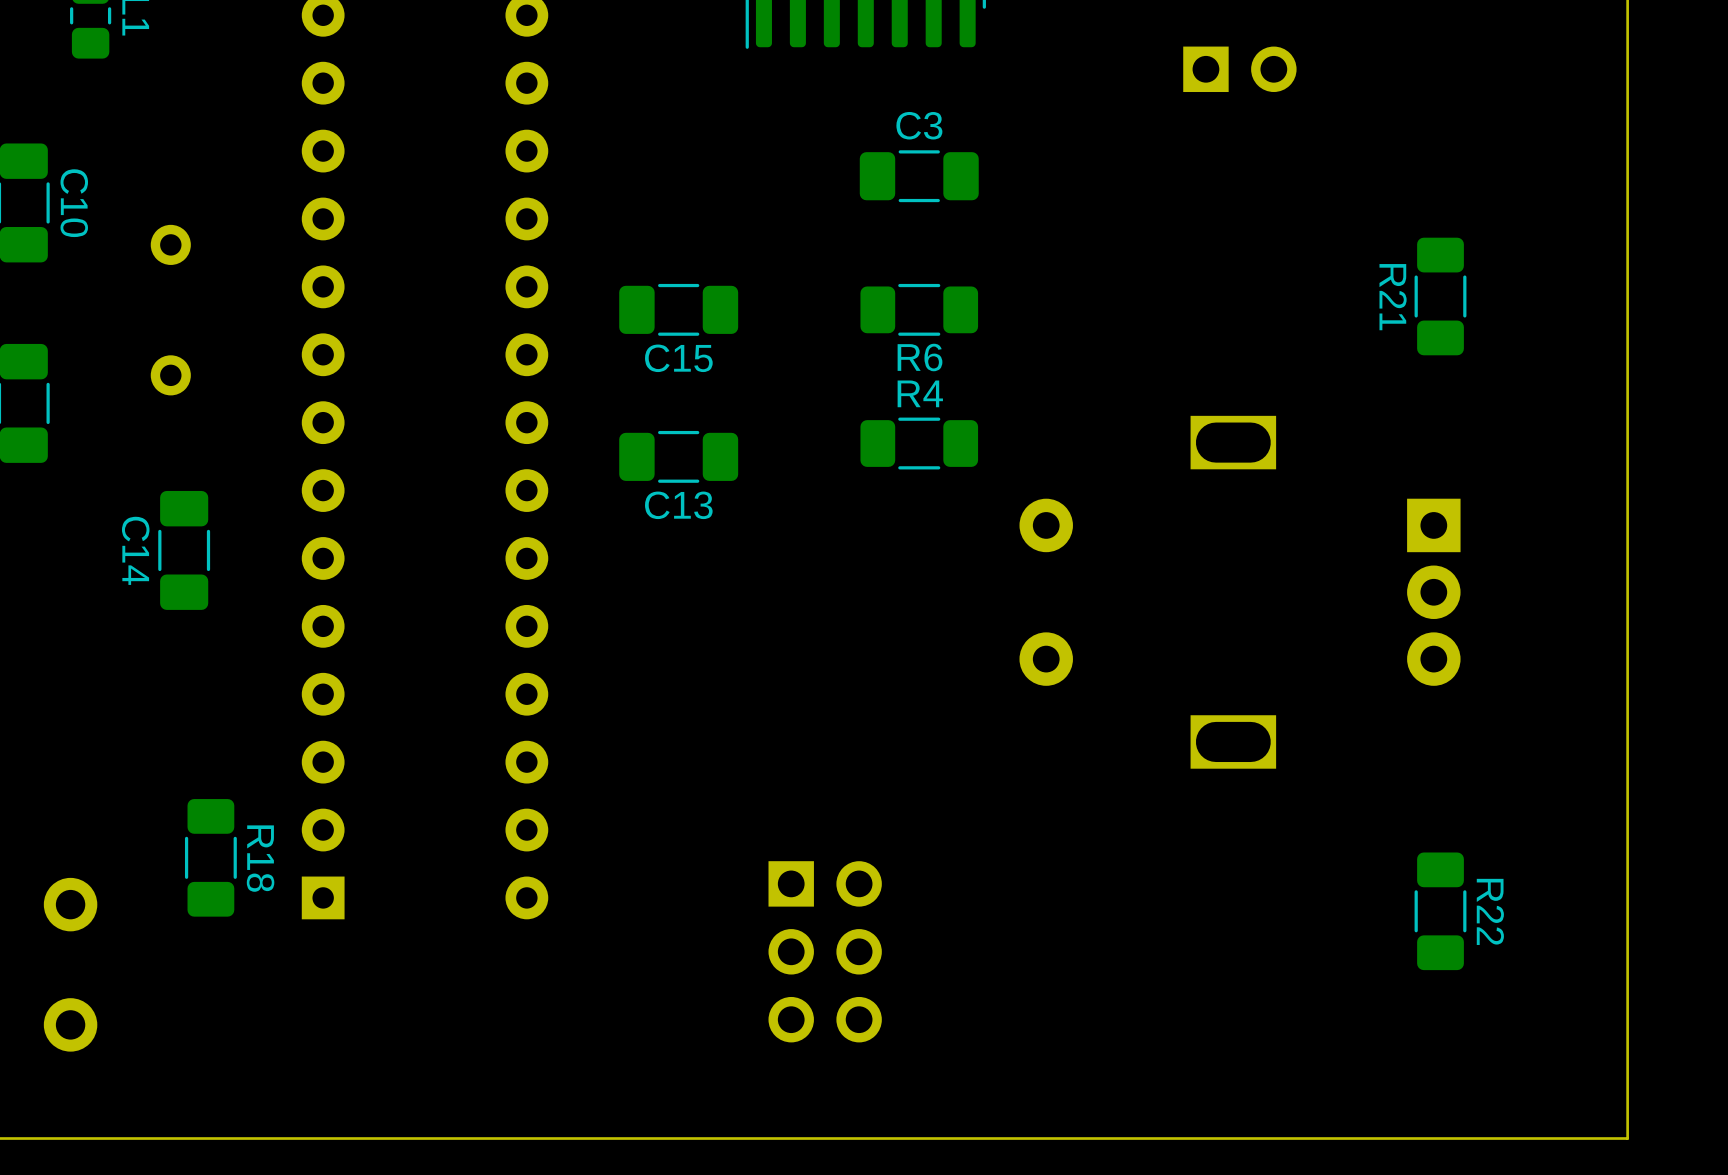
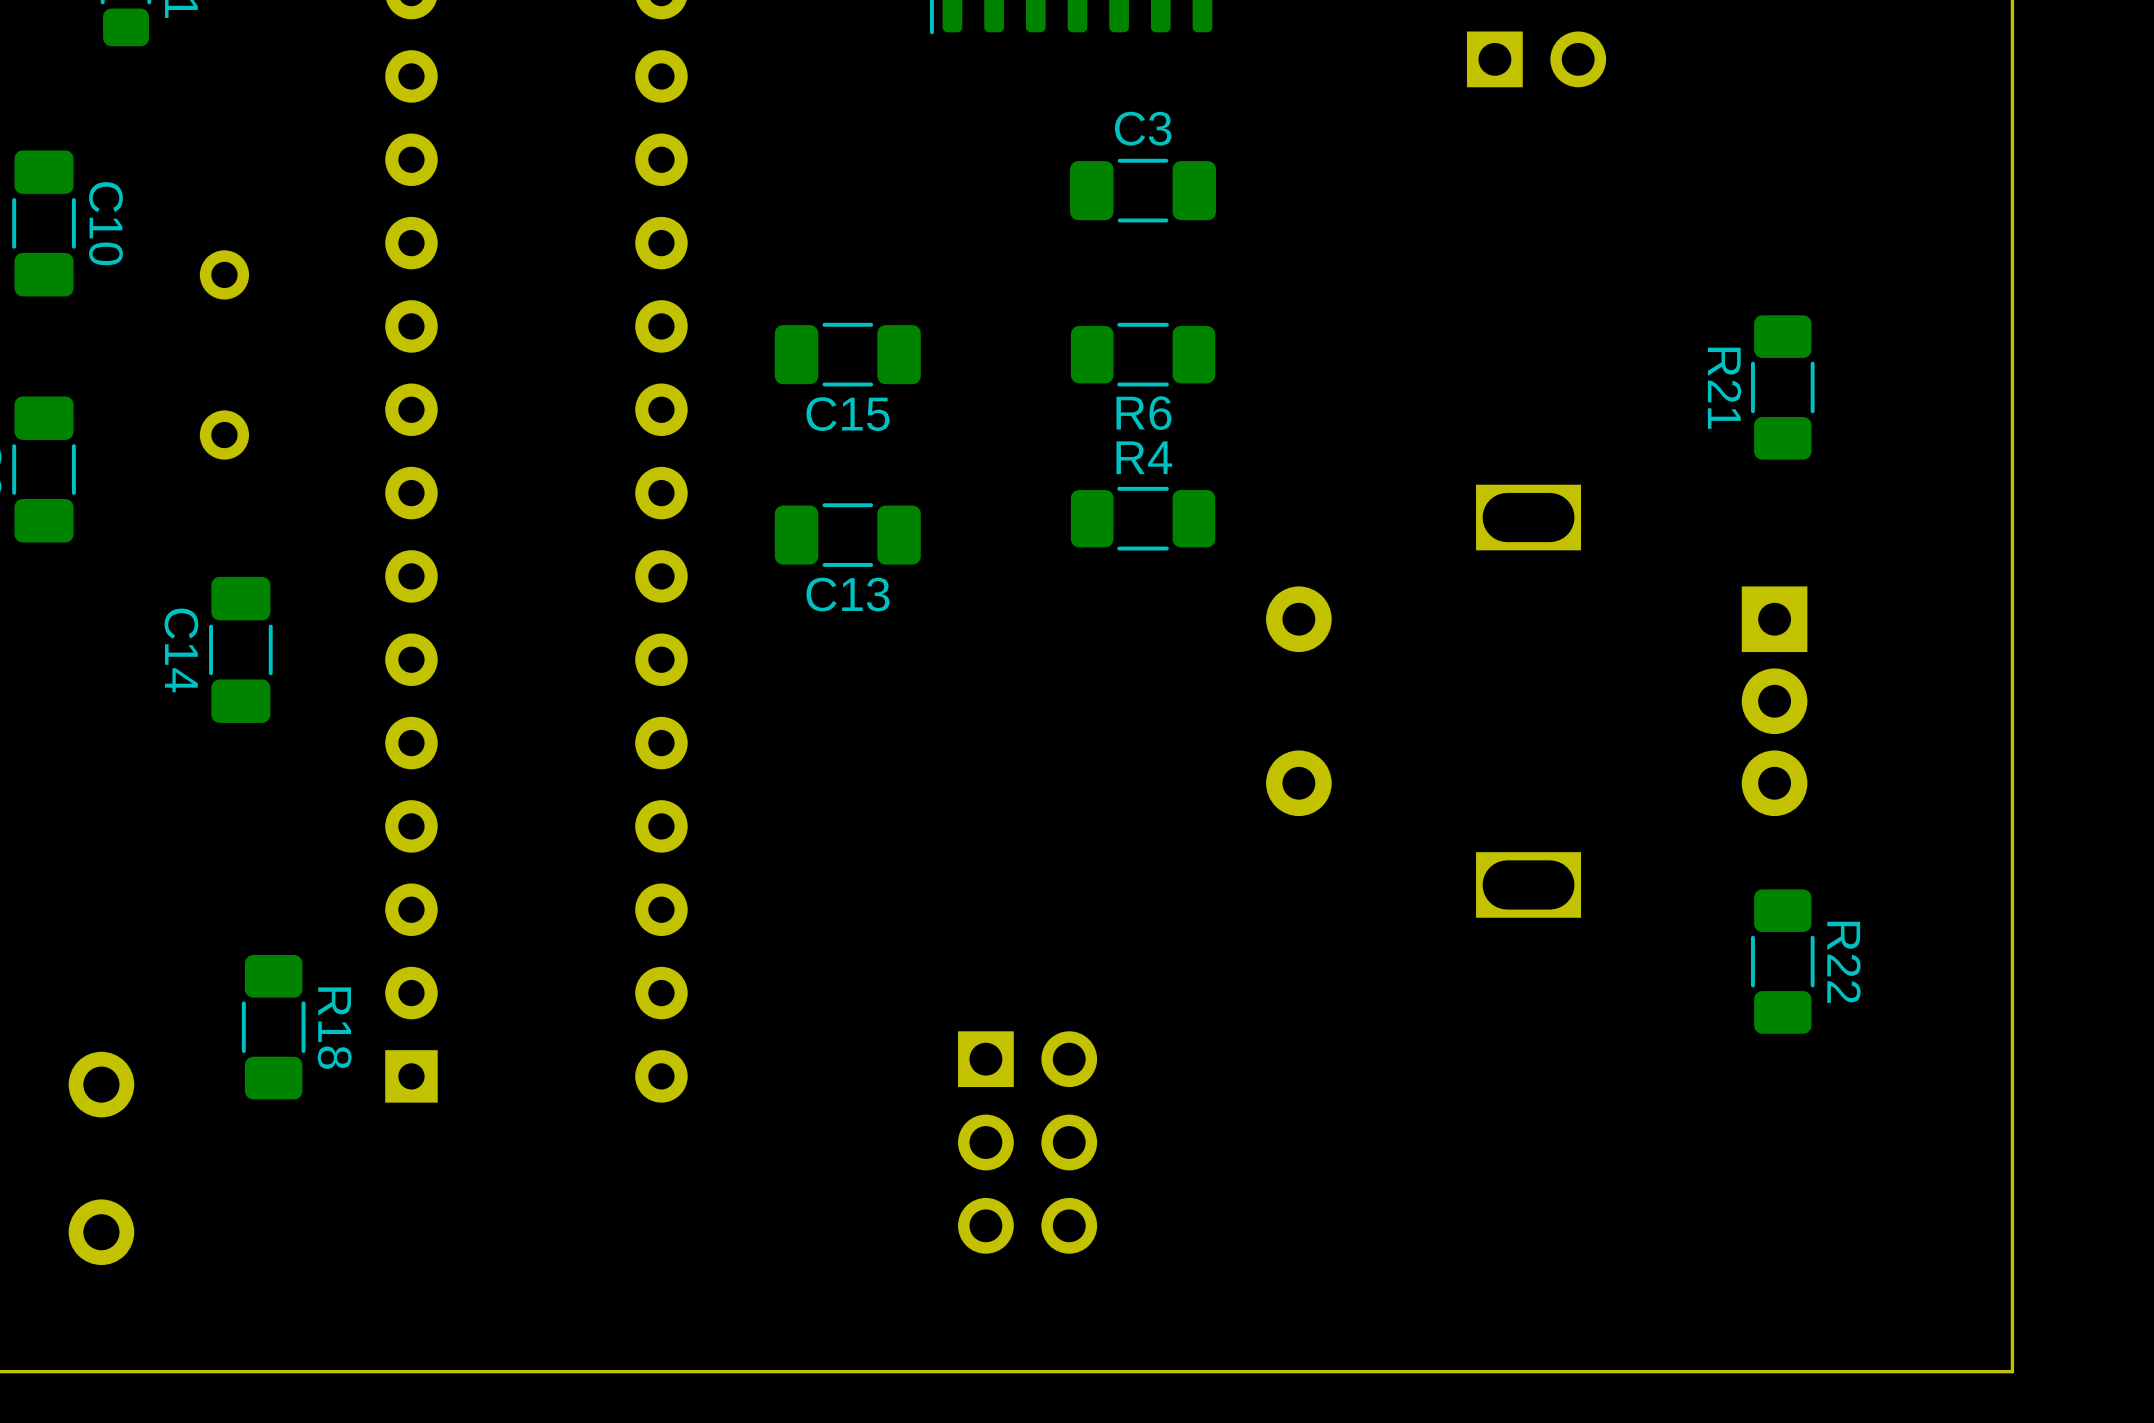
R21 position: (1440, 296) -> (1782, 387)
R22 position: (1440, 911) -> (1782, 961)

